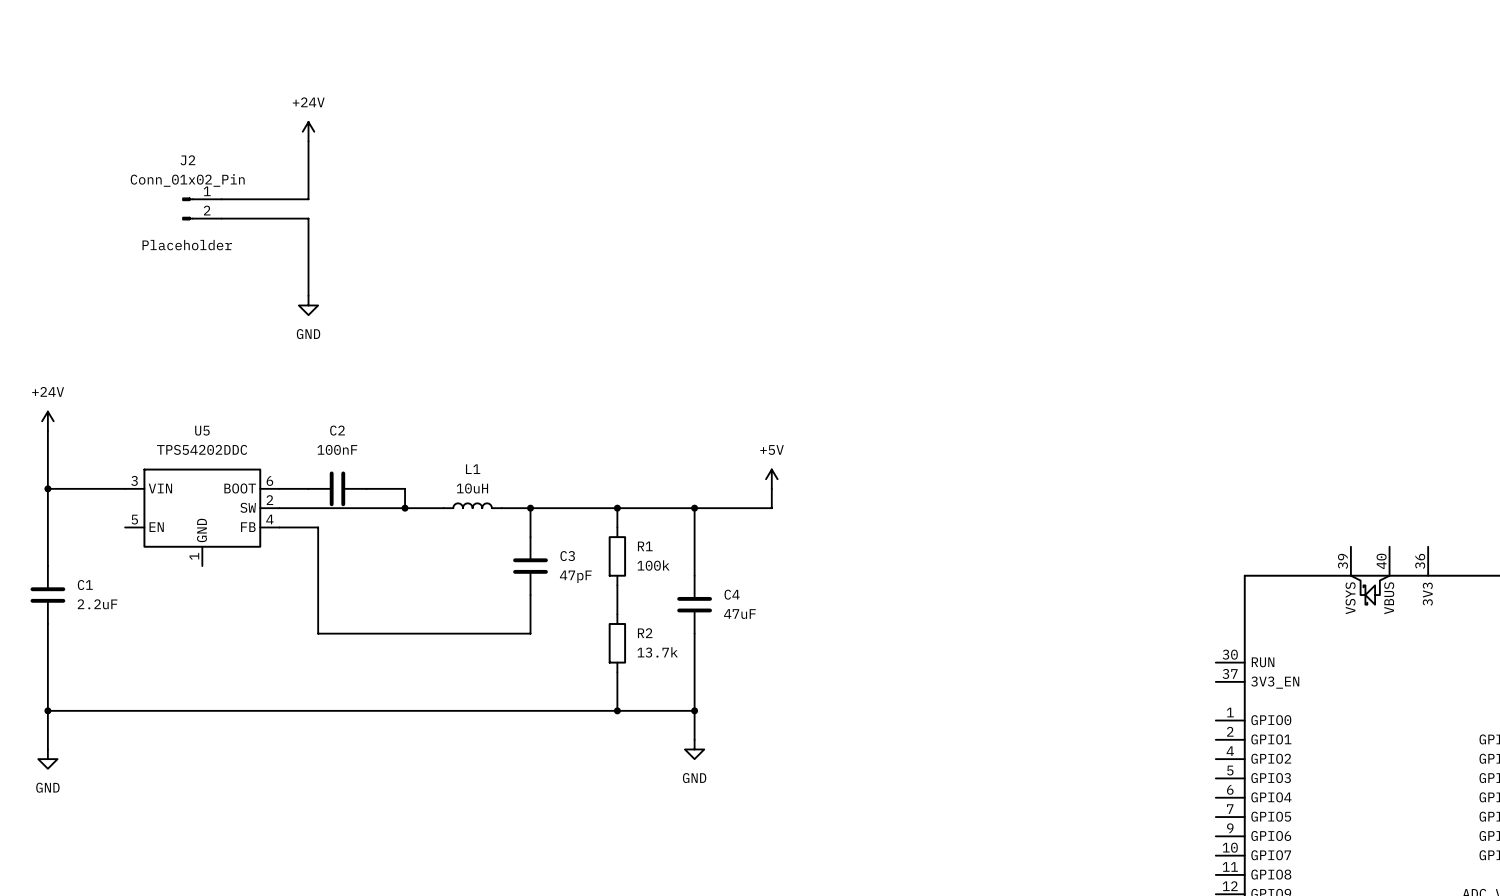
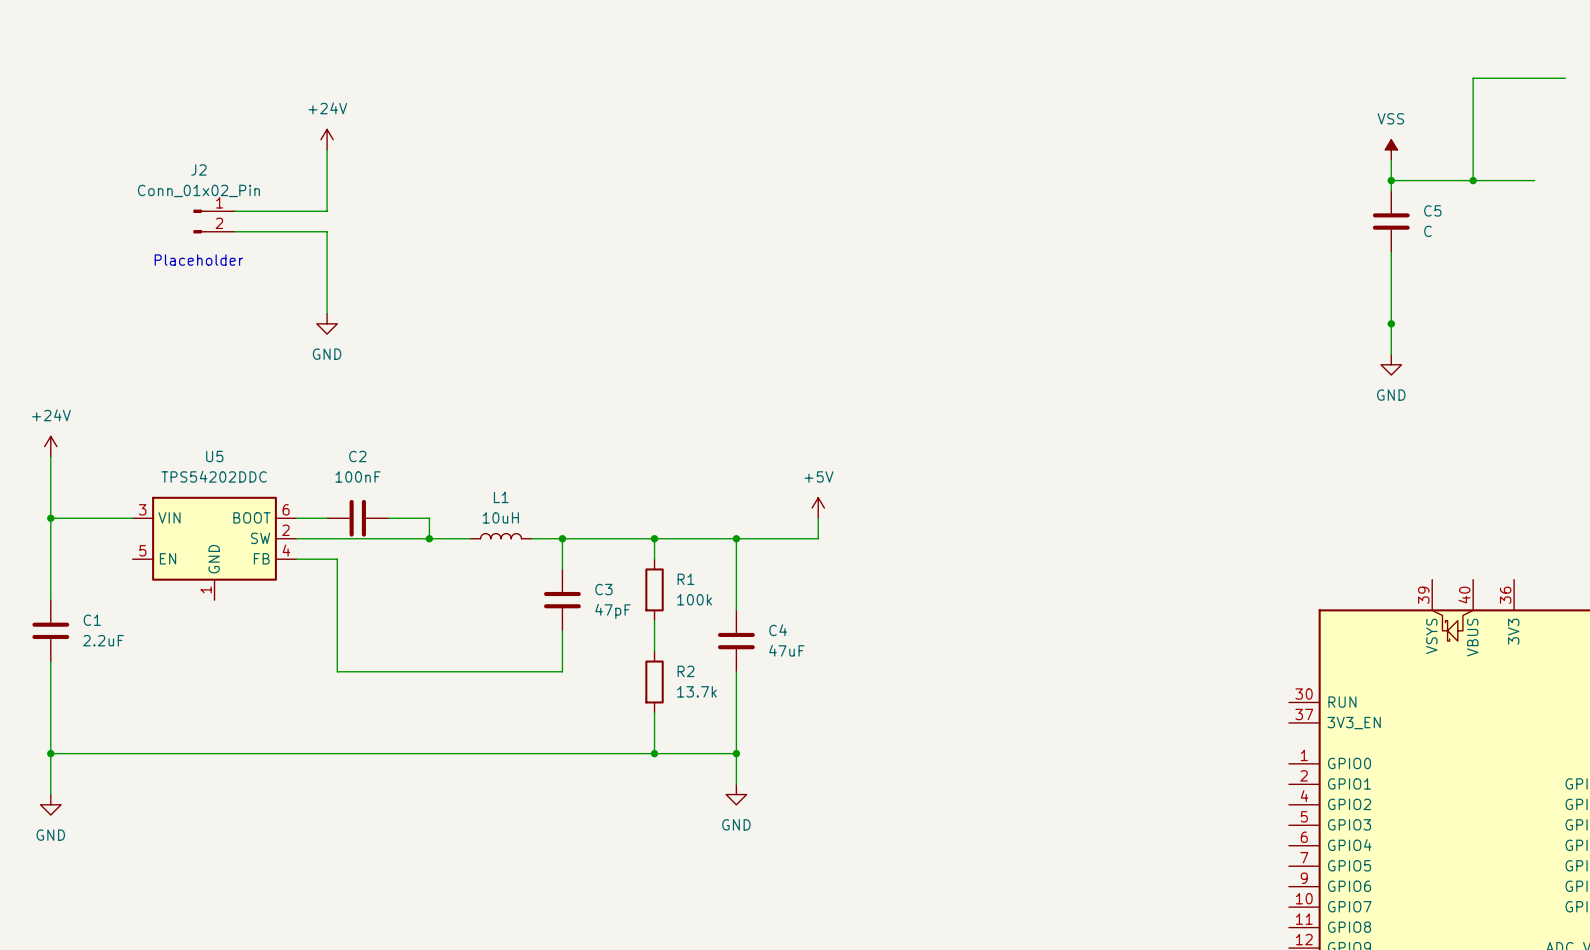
wire: none -> (1565, 78) (1473, 78) (1473, 180)
power symbol: none -> VSS (1391, 149)
wire: none -> (1391, 160) (1391, 190)
wire: none -> (1391, 180) (1534, 180)
junction: none -> (1391, 180)
junction: none -> (1473, 180)
C5: none -> C (1391, 221)
wire: none -> (1391, 252) (1391, 354)
junction: none -> (1391, 323)
power symbol: none -> GND (1391, 364)

